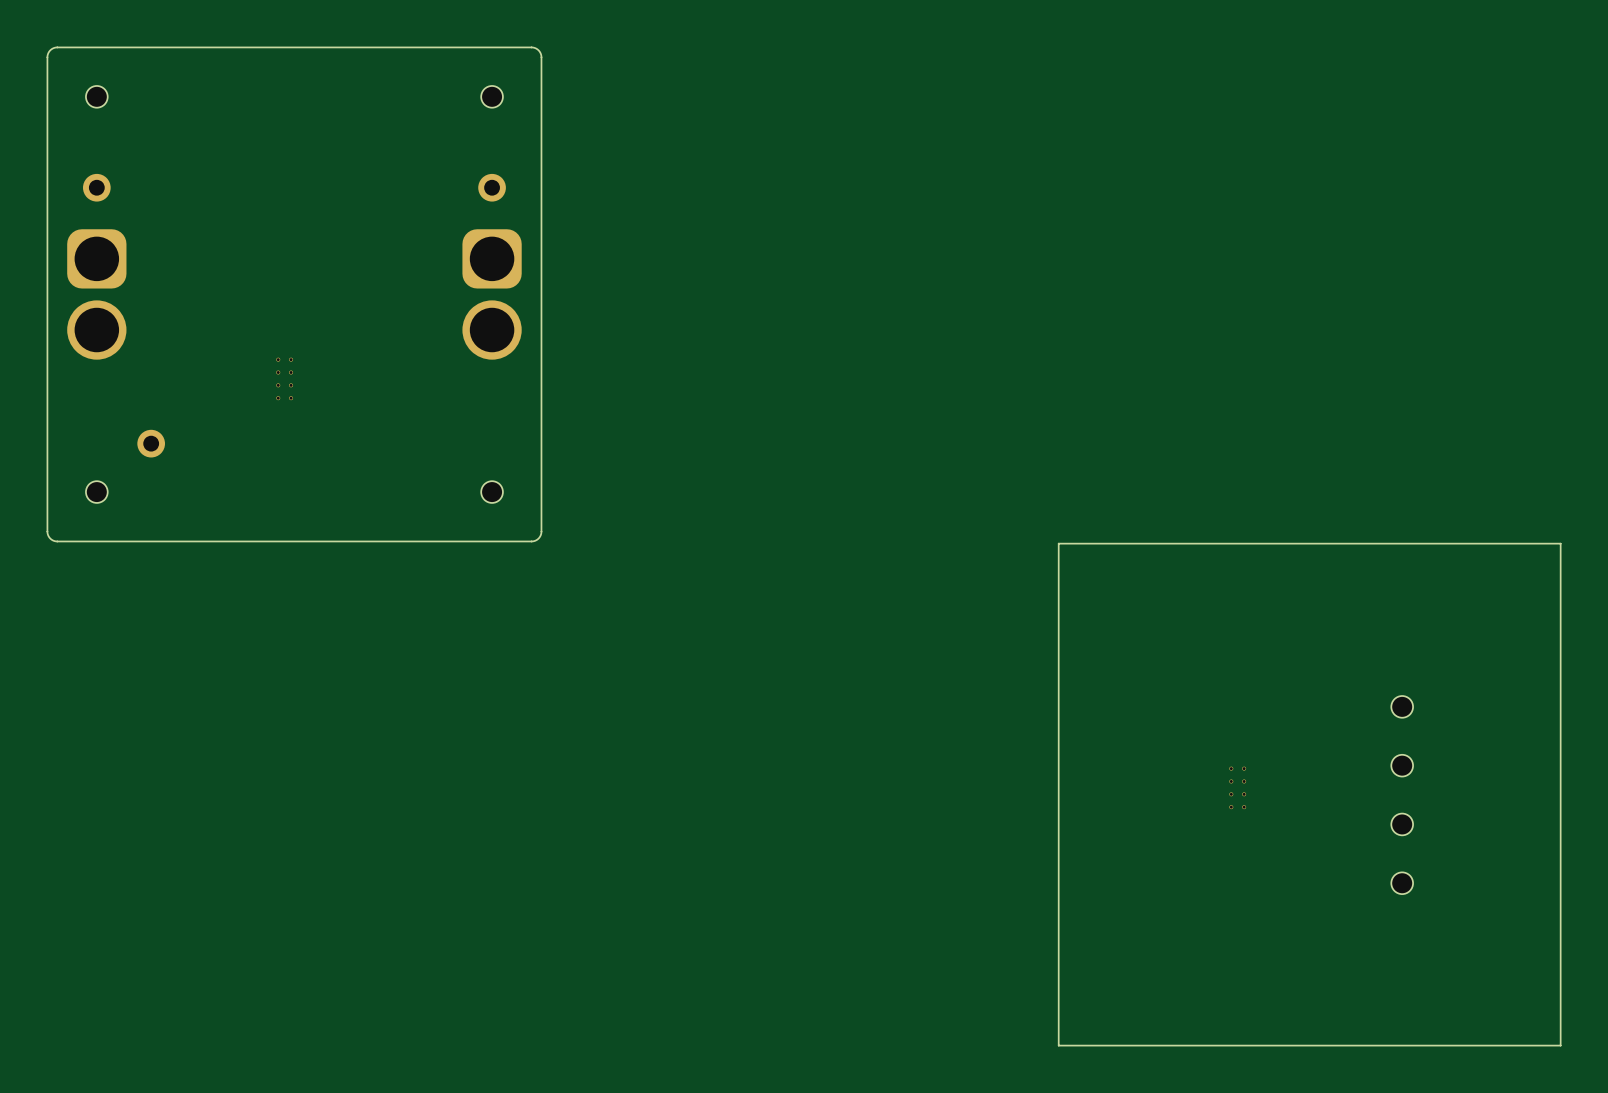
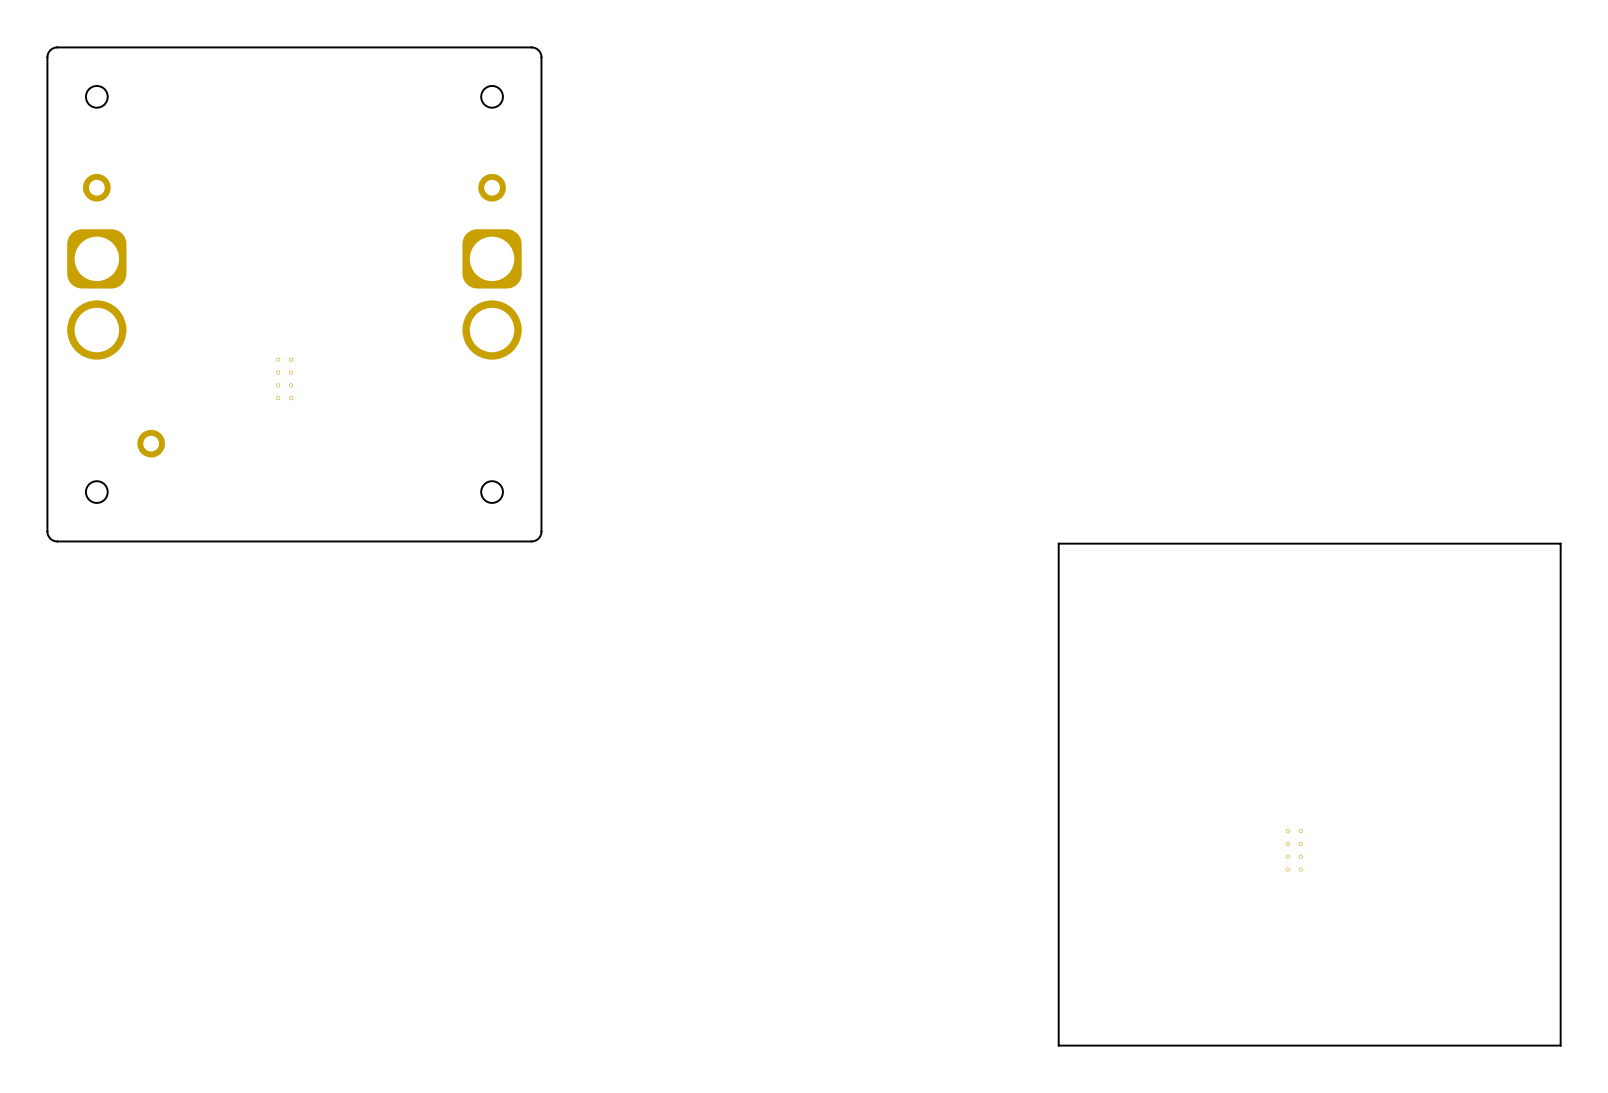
part: (1402, 706) -> none
part: (1402, 765) -> none
part position: (1237, 787) -> (1294, 850)
part: (1402, 824) -> none
part: (1402, 883) -> none

